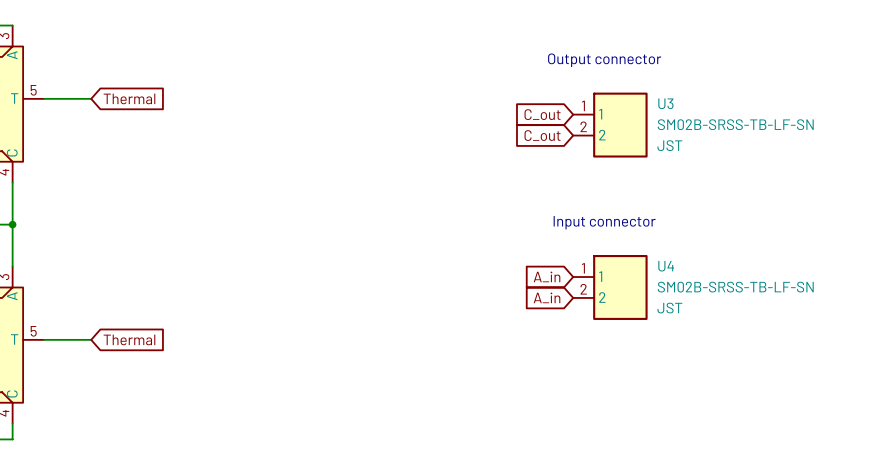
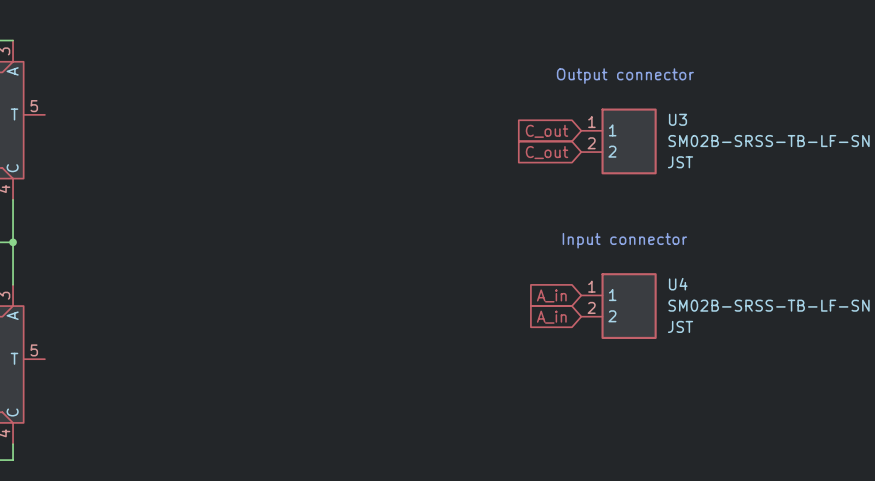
wire: (44, 98) (91, 98) -> none
global label: Thermal (129, 98) -> none
wire: (44, 339) (91, 339) -> none
global label: Thermal (129, 339) -> none

